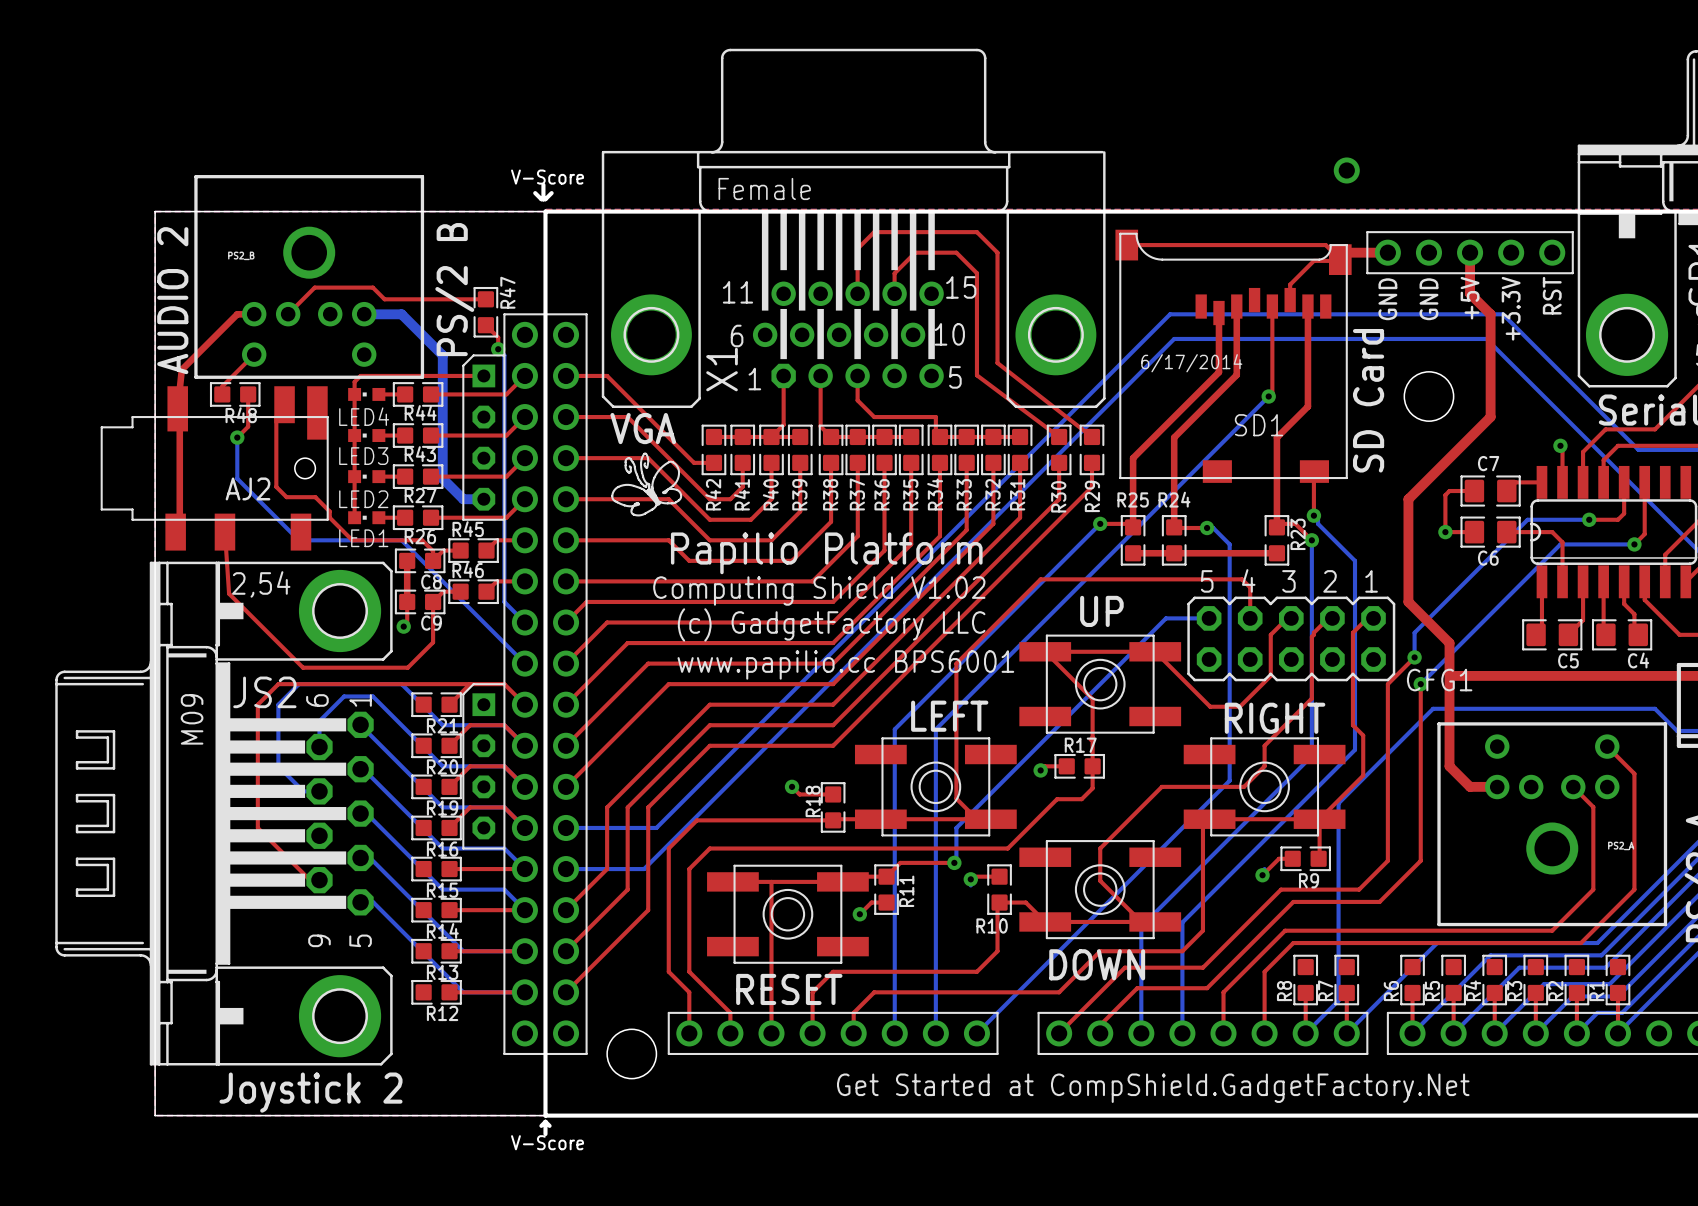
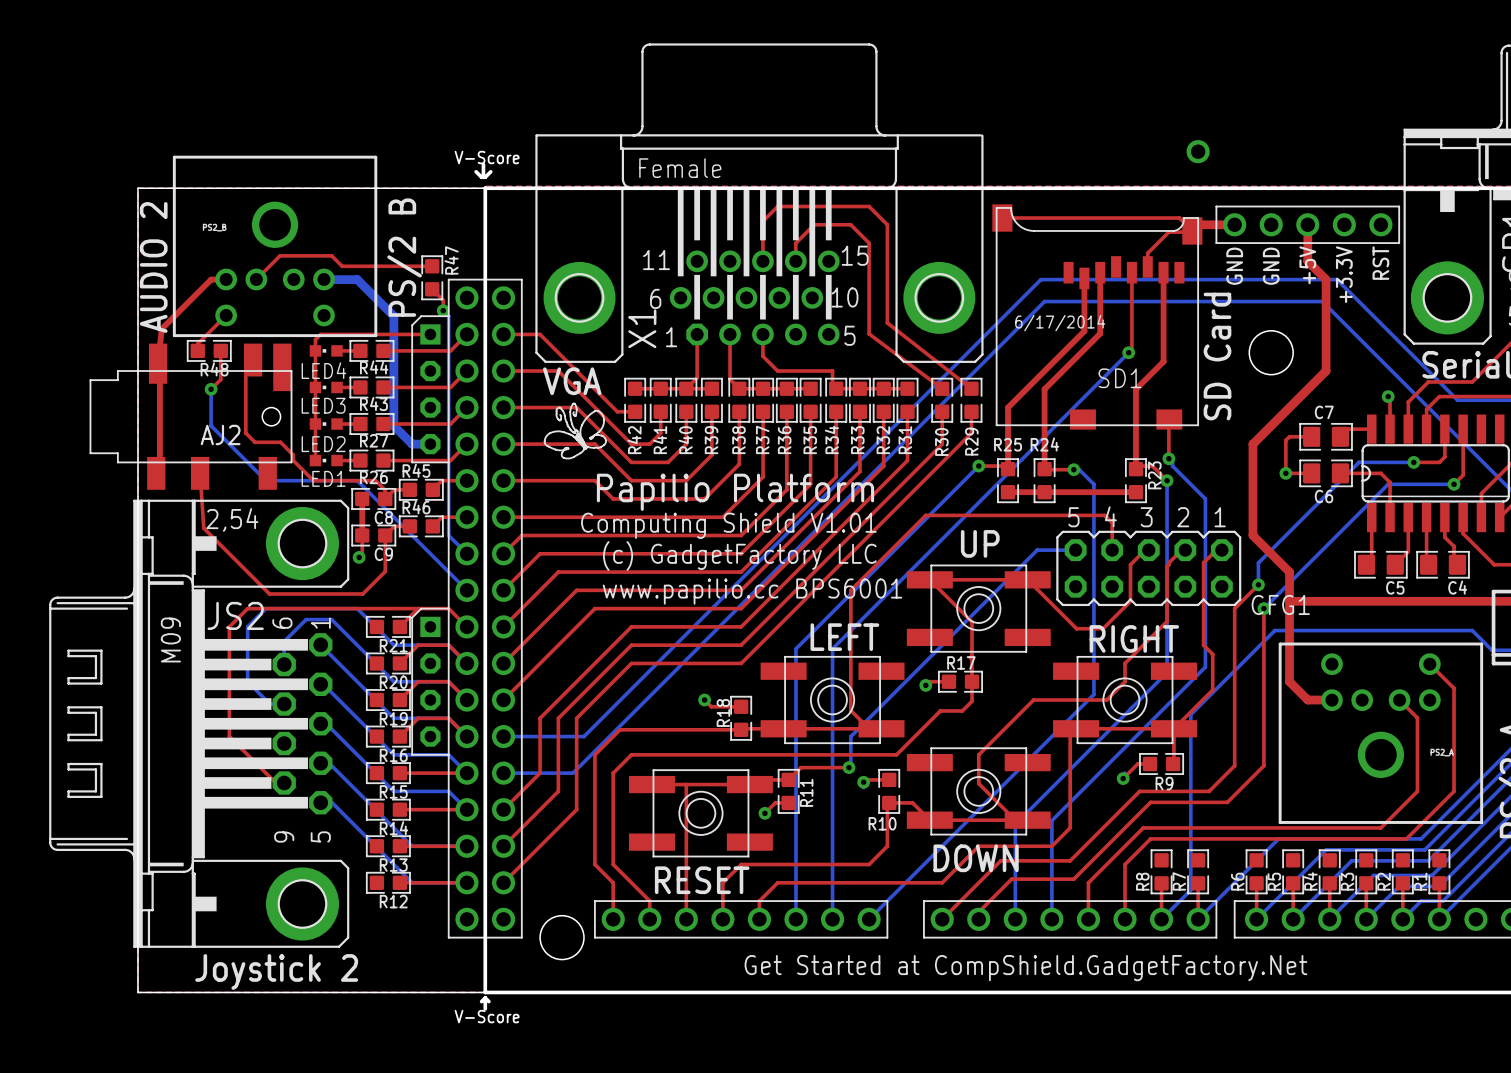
text: Computing Shield V1.02 (819, 591) -> Computing Shield V1.01 (728, 525)

